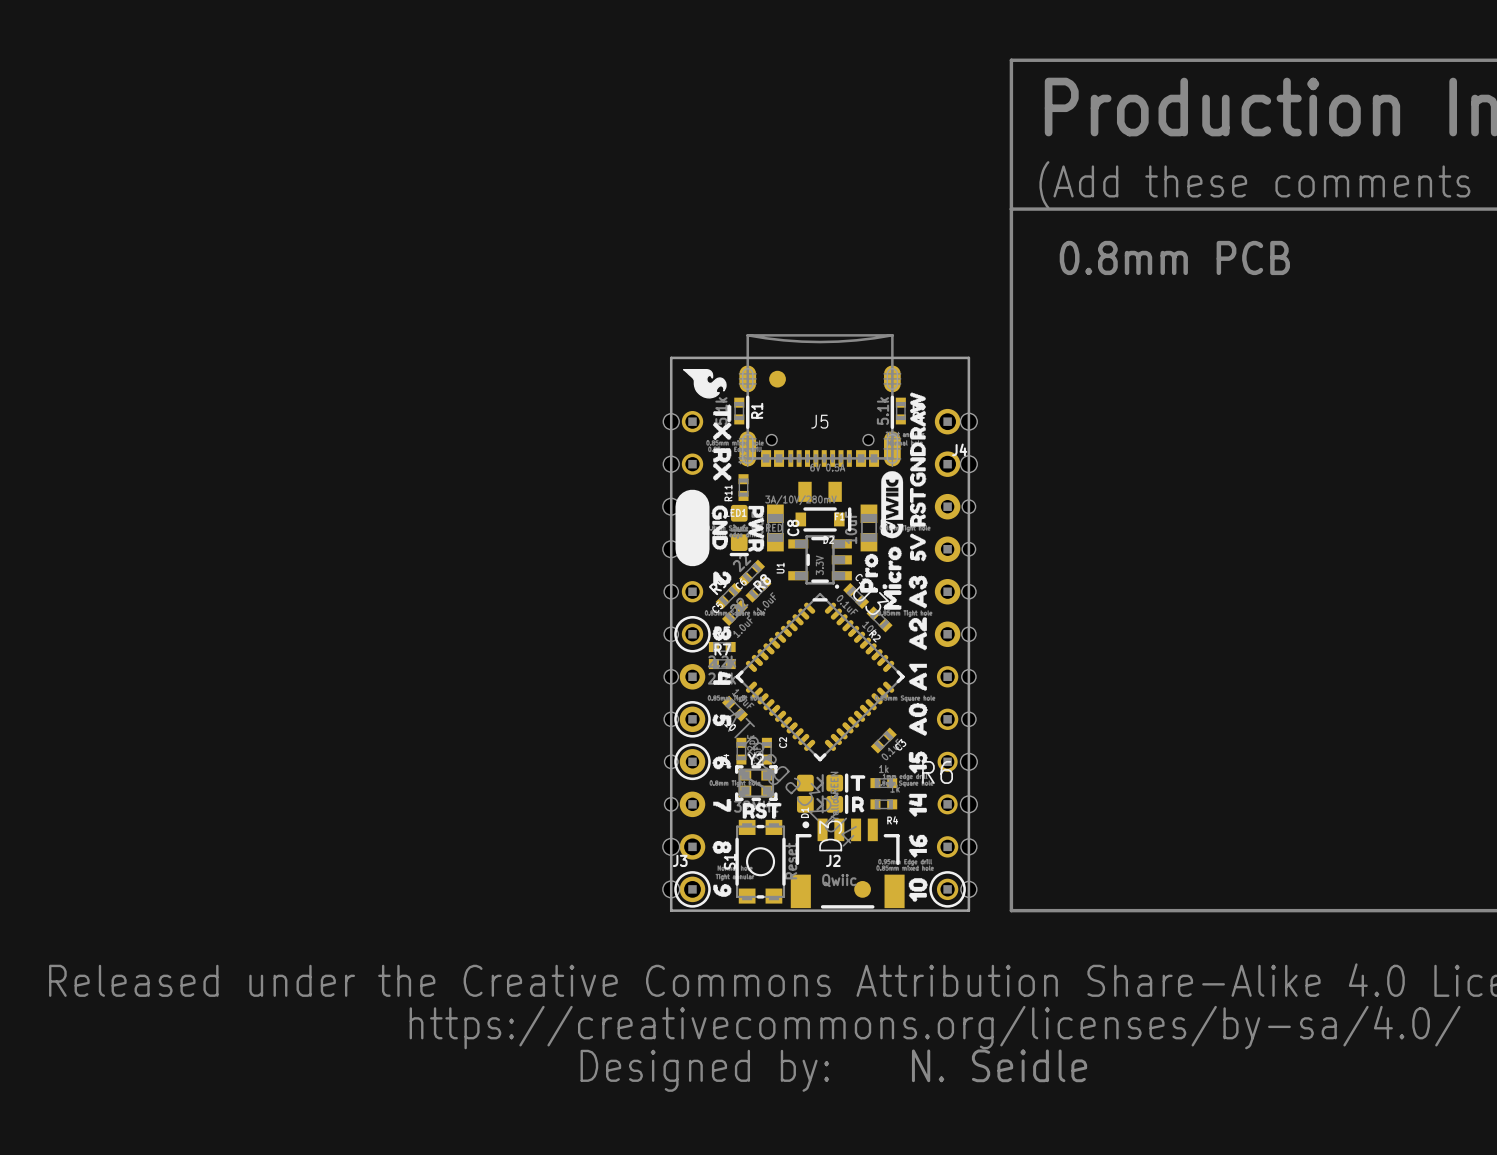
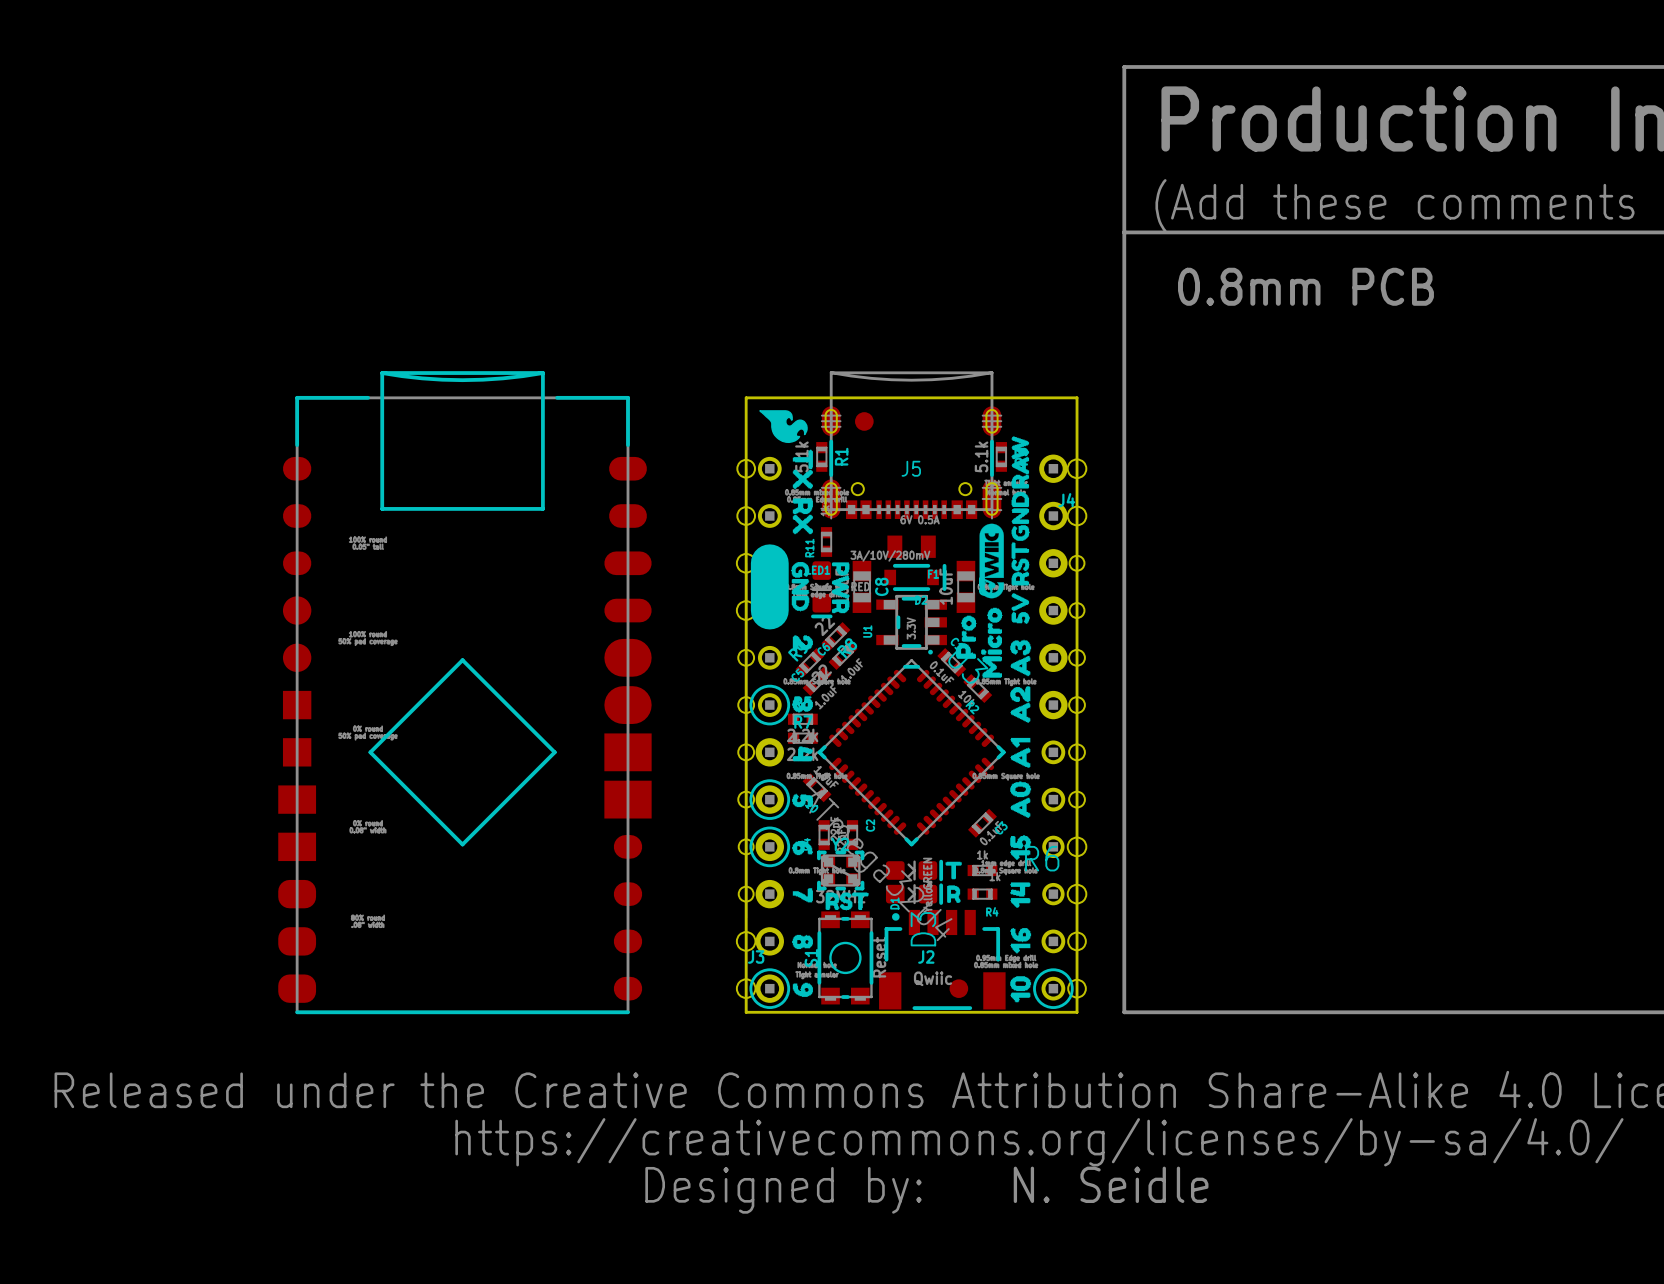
part: none -> (464, 692)

